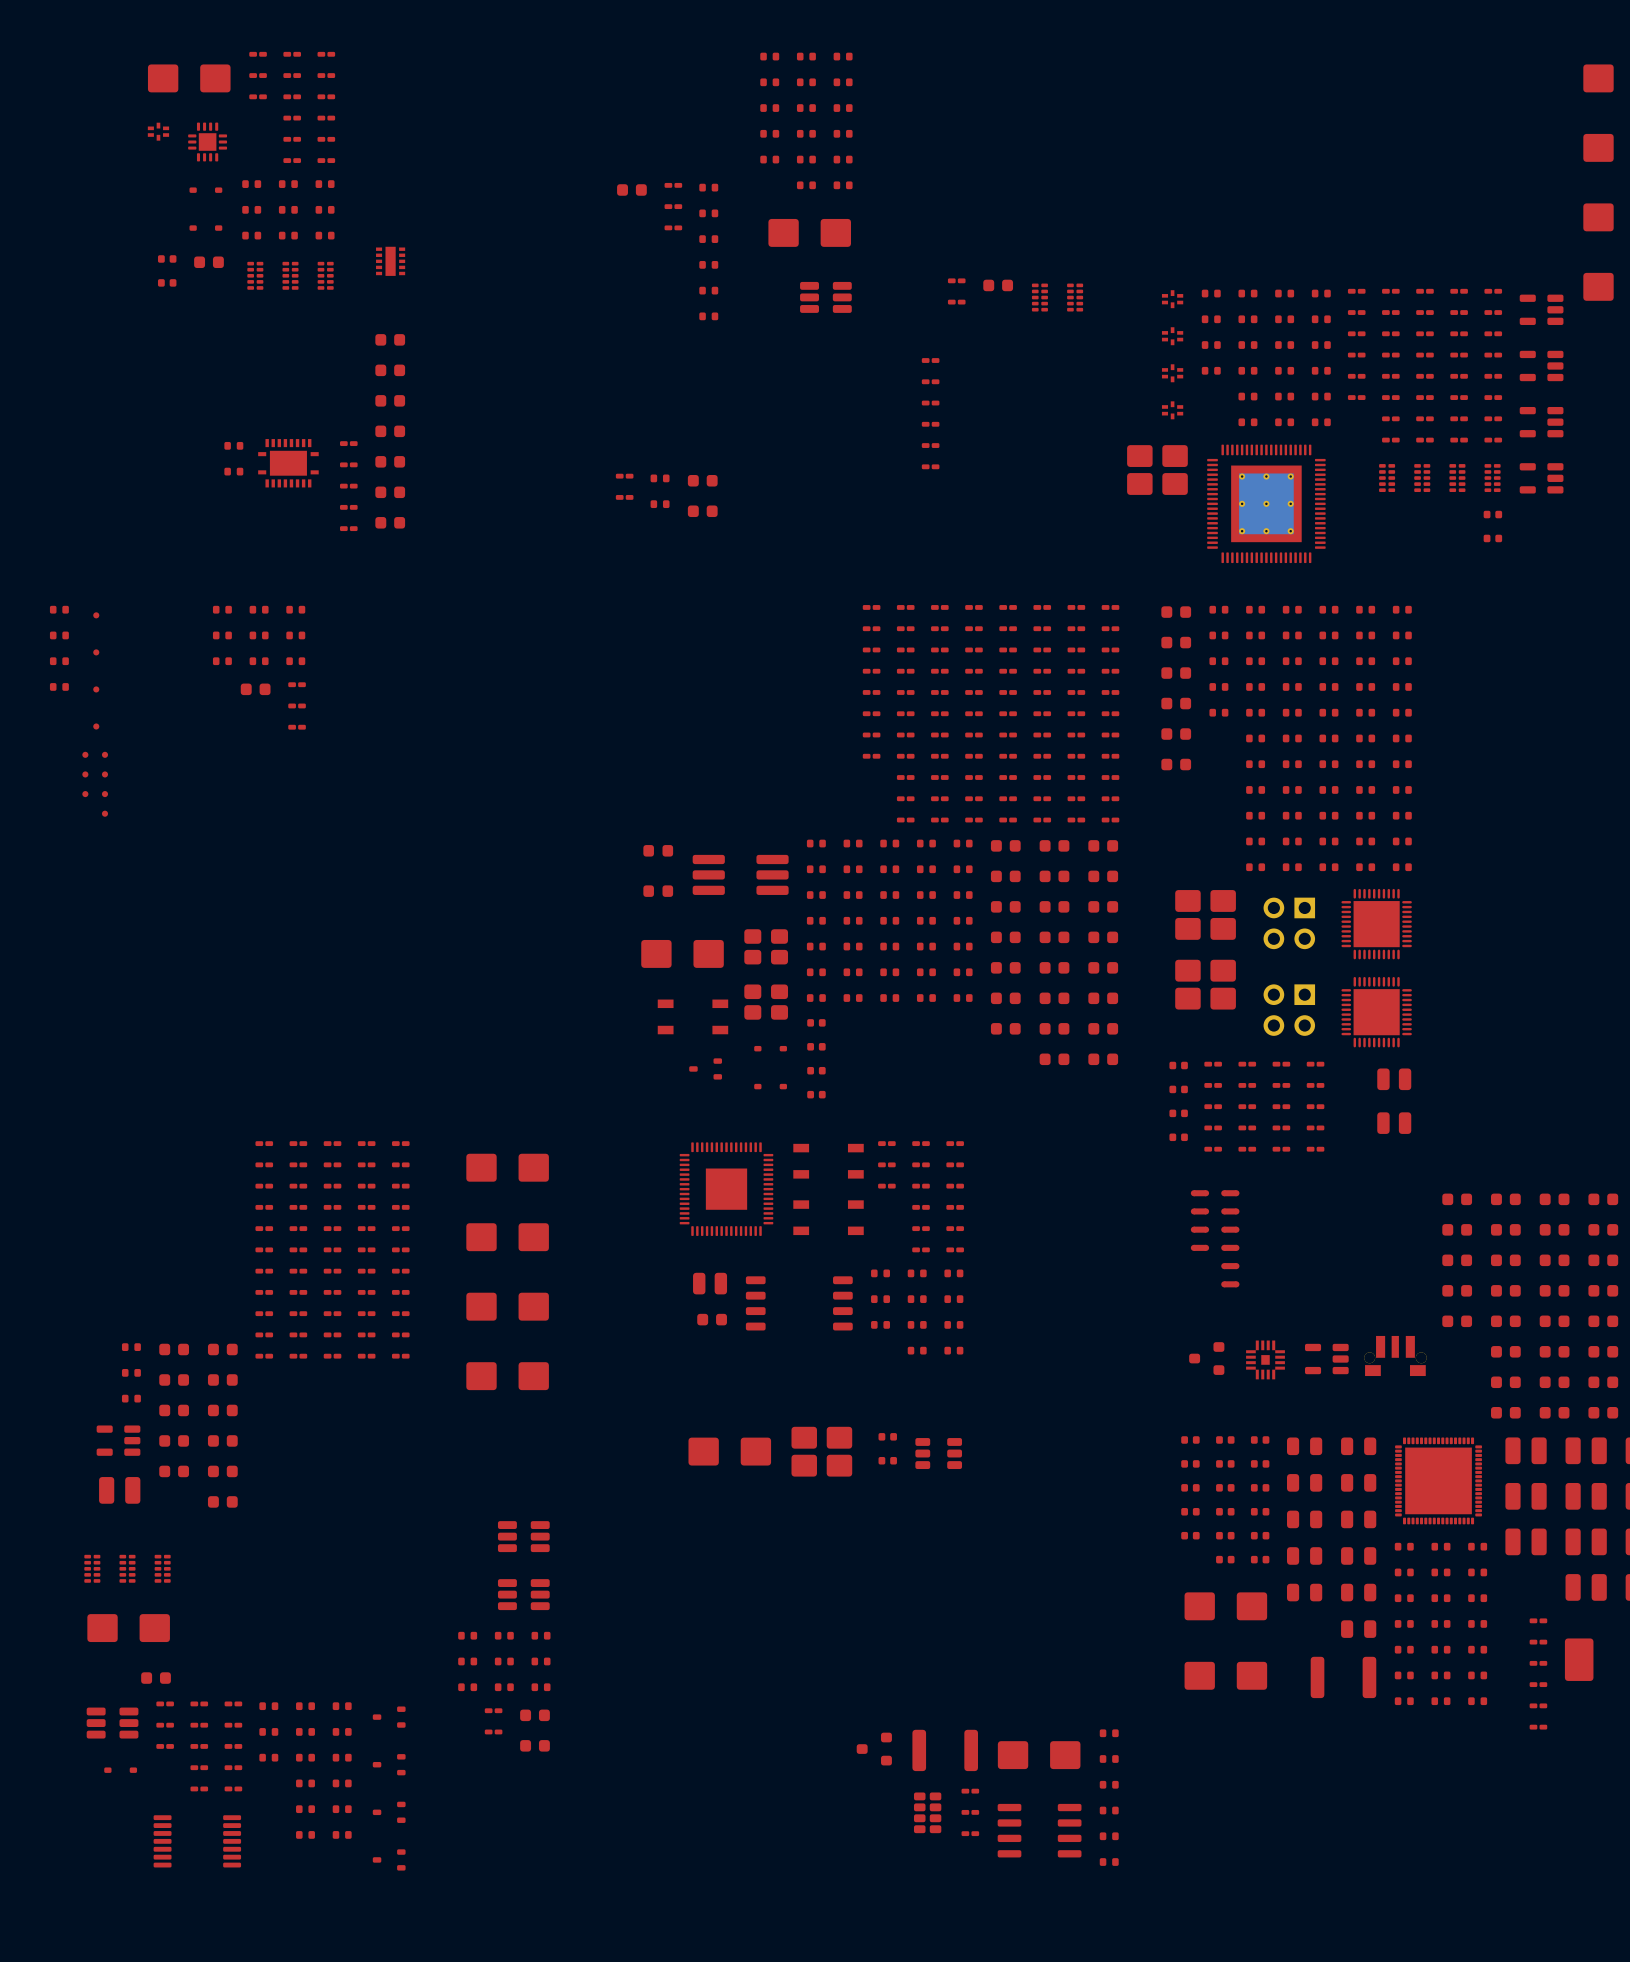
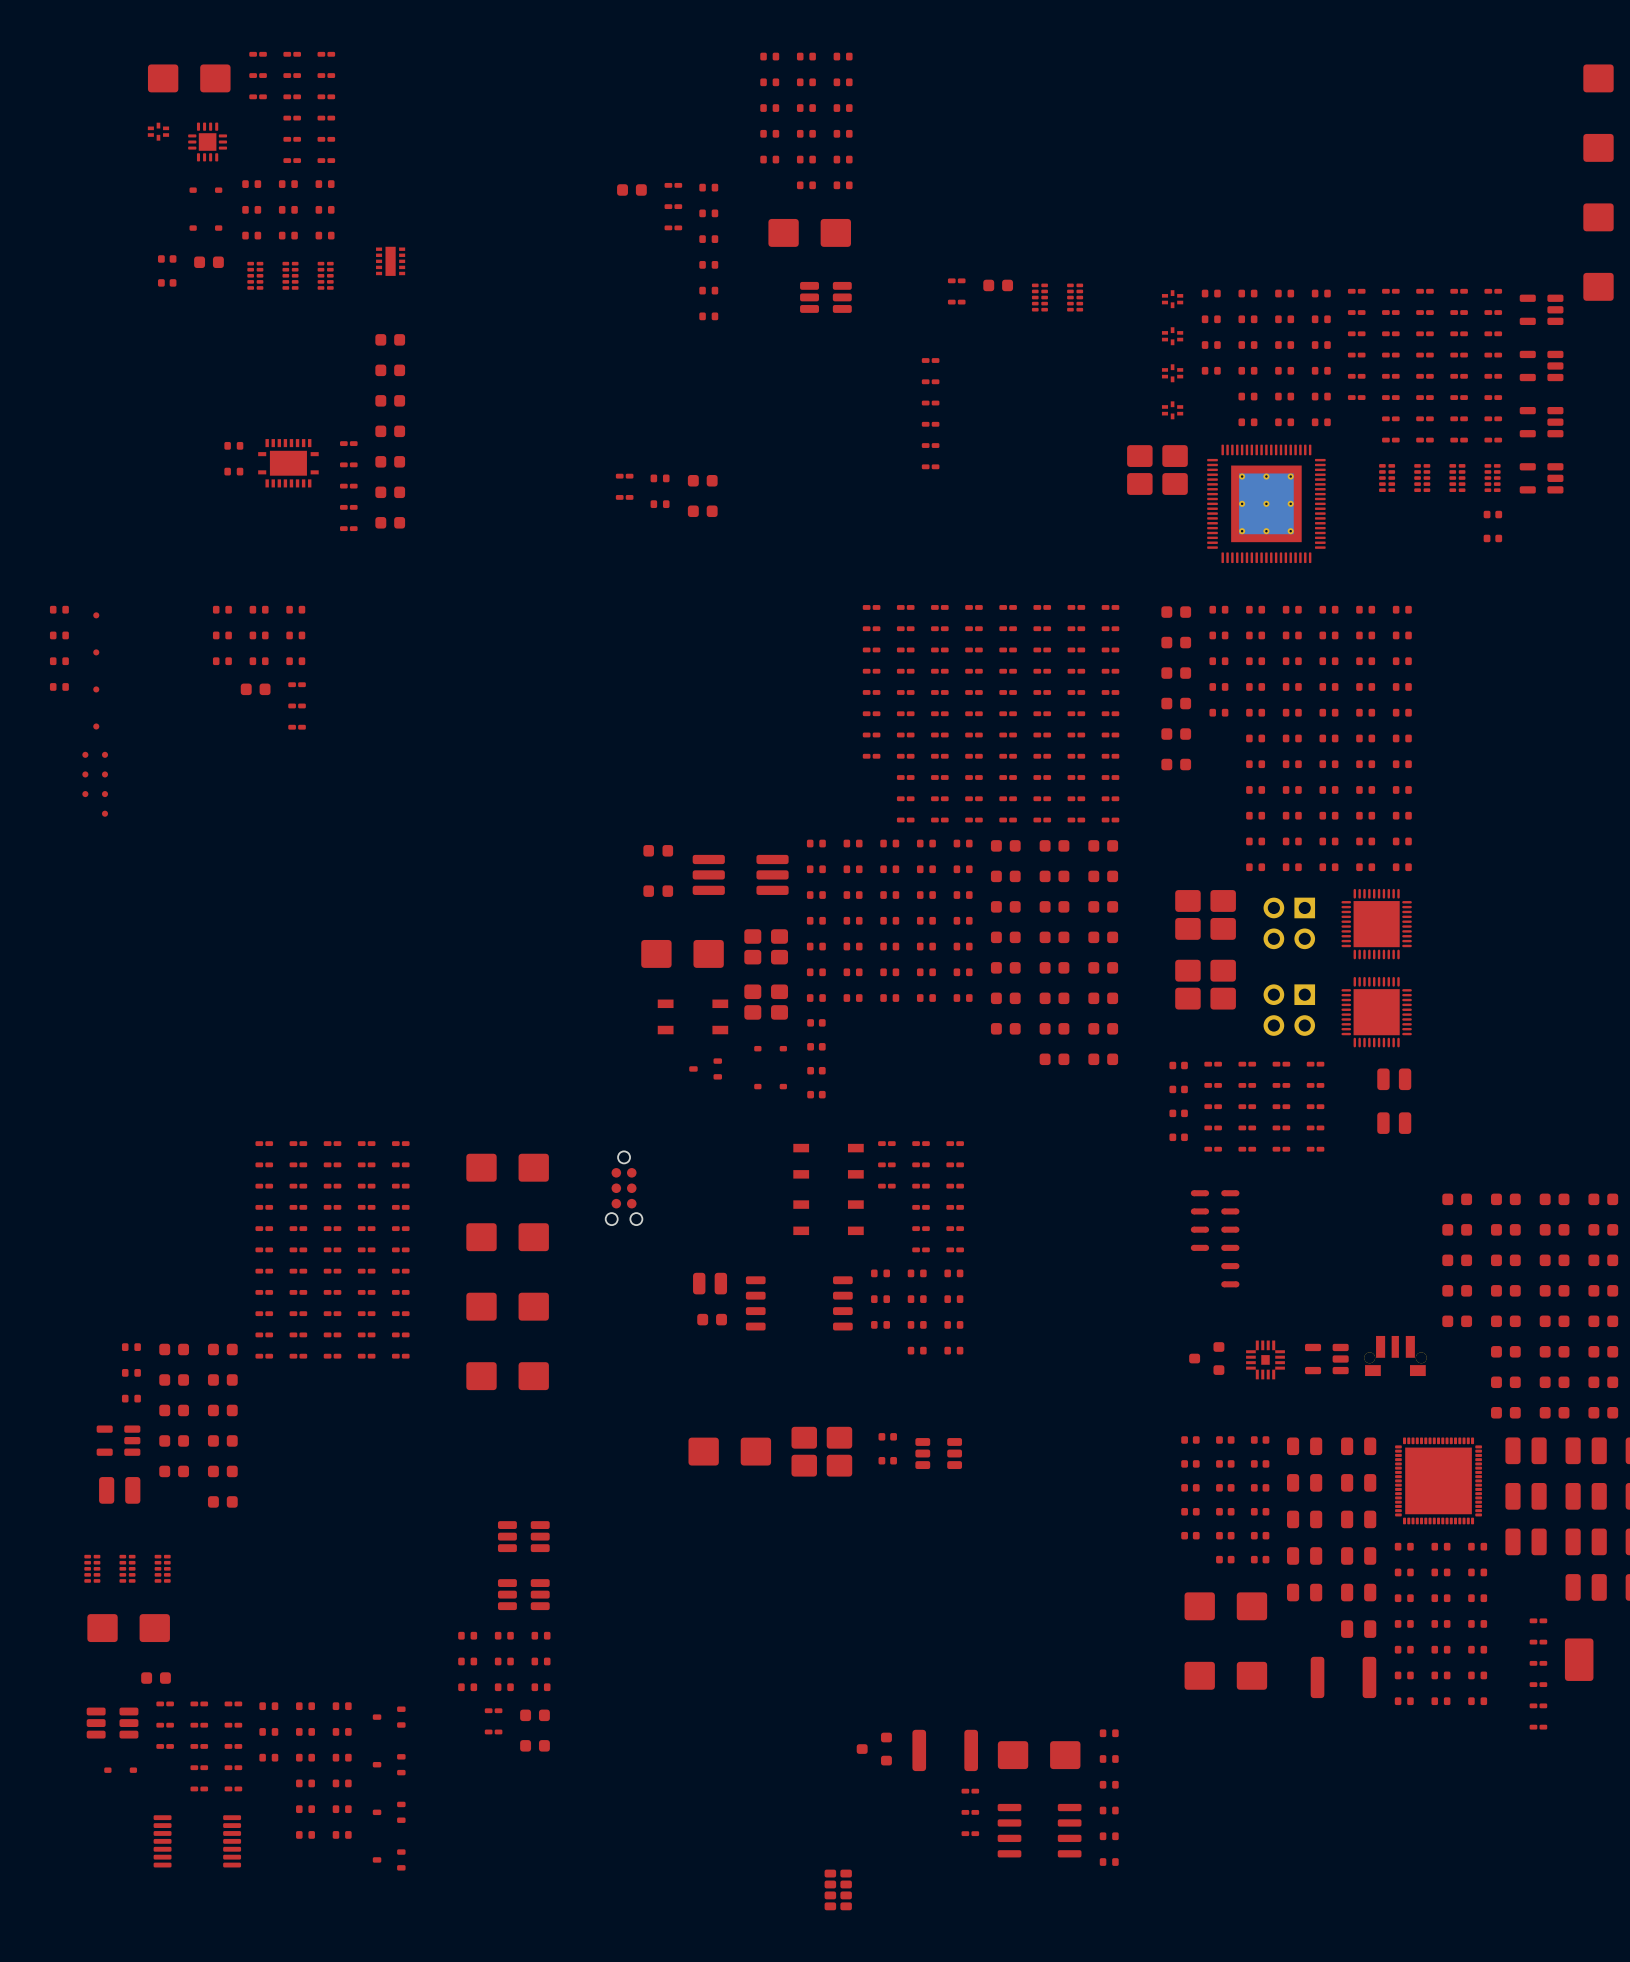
part: none -> (624, 1188)
part: (726, 1189) -> none
part position: (927, 1812) -> (838, 1889)

